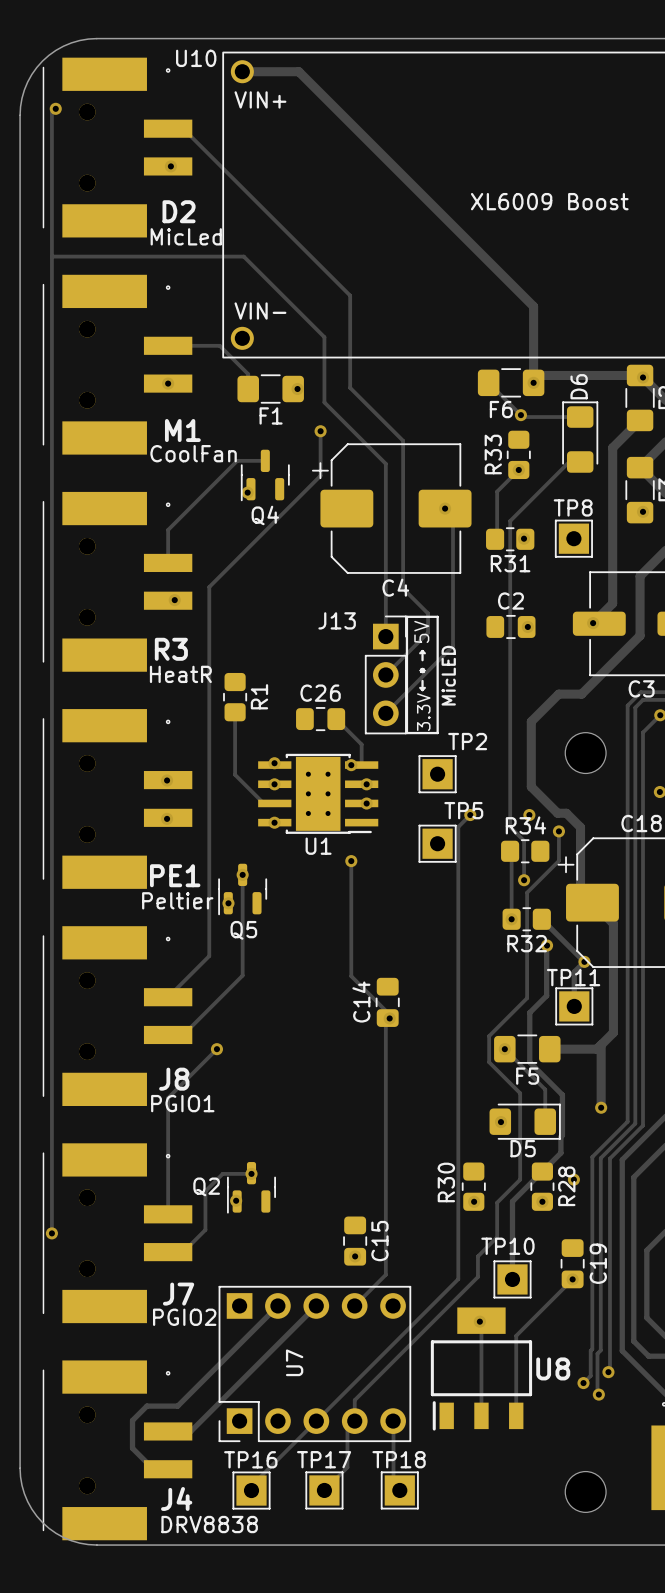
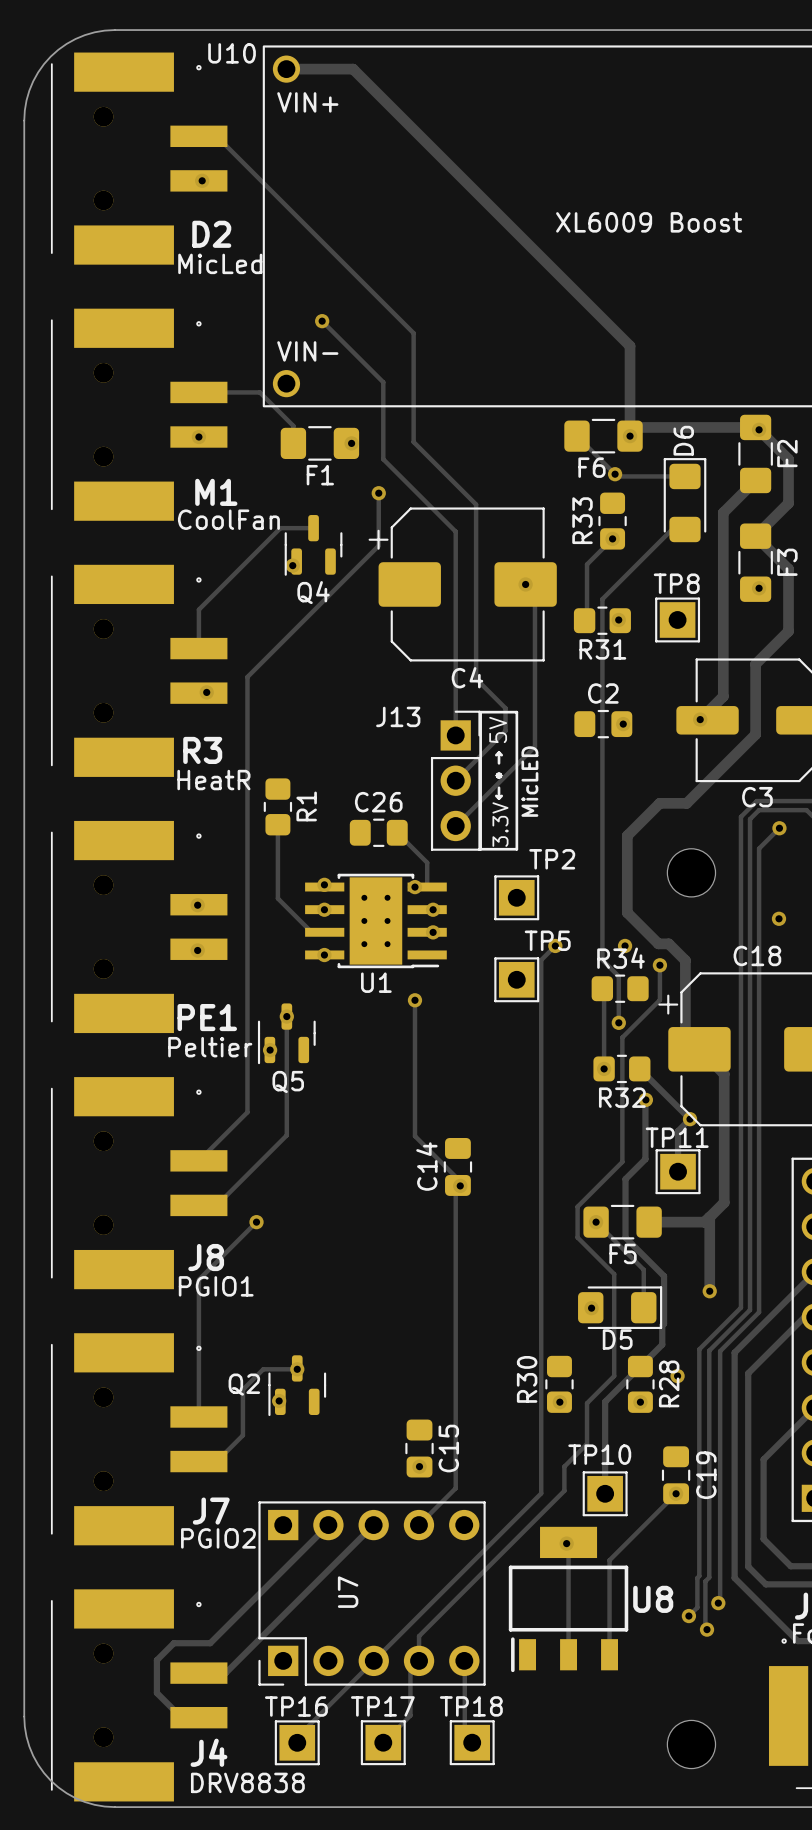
track: (55, 108) (51, 112) (51, 1233) -> none
via: (55, 108) -> none
track: (51, 256) (243, 256) (272, 285) -> none
via: none -> (322, 321)
via: (51, 1233) -> none

